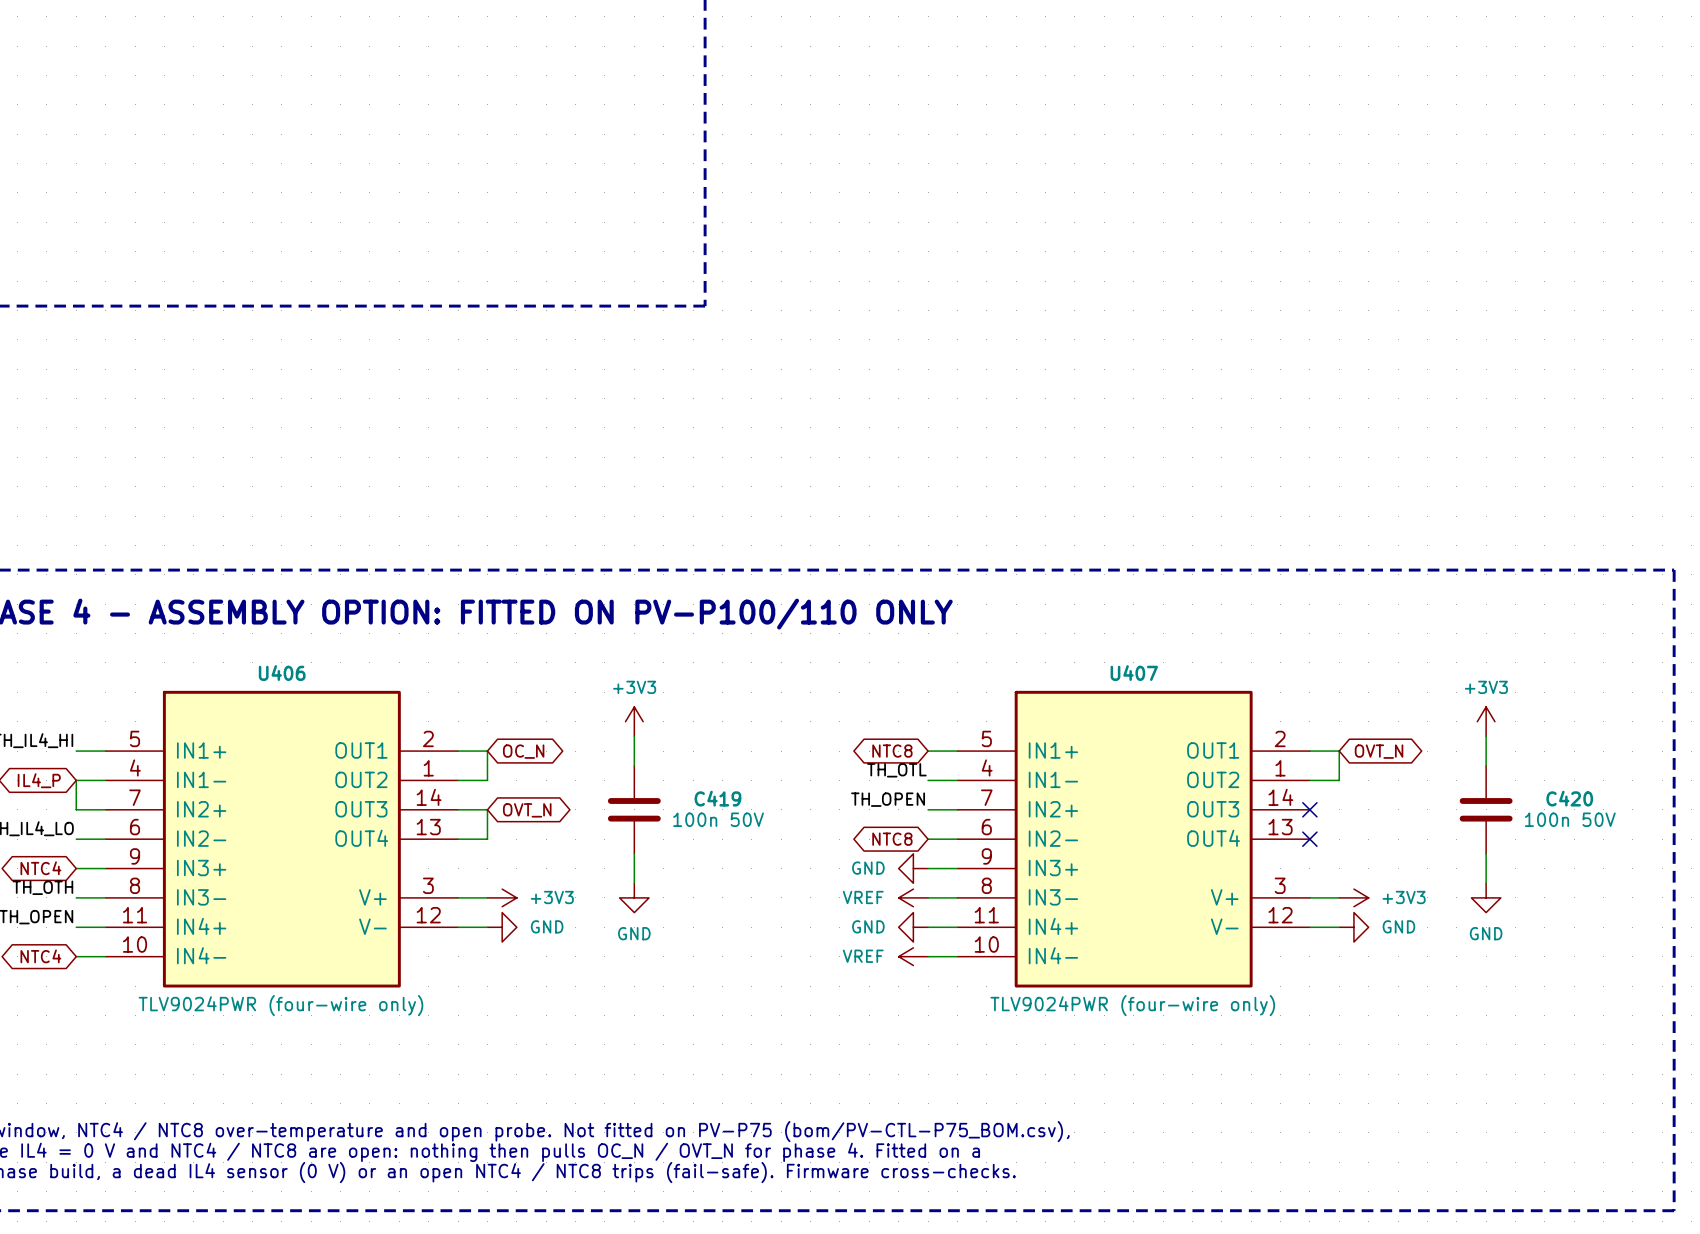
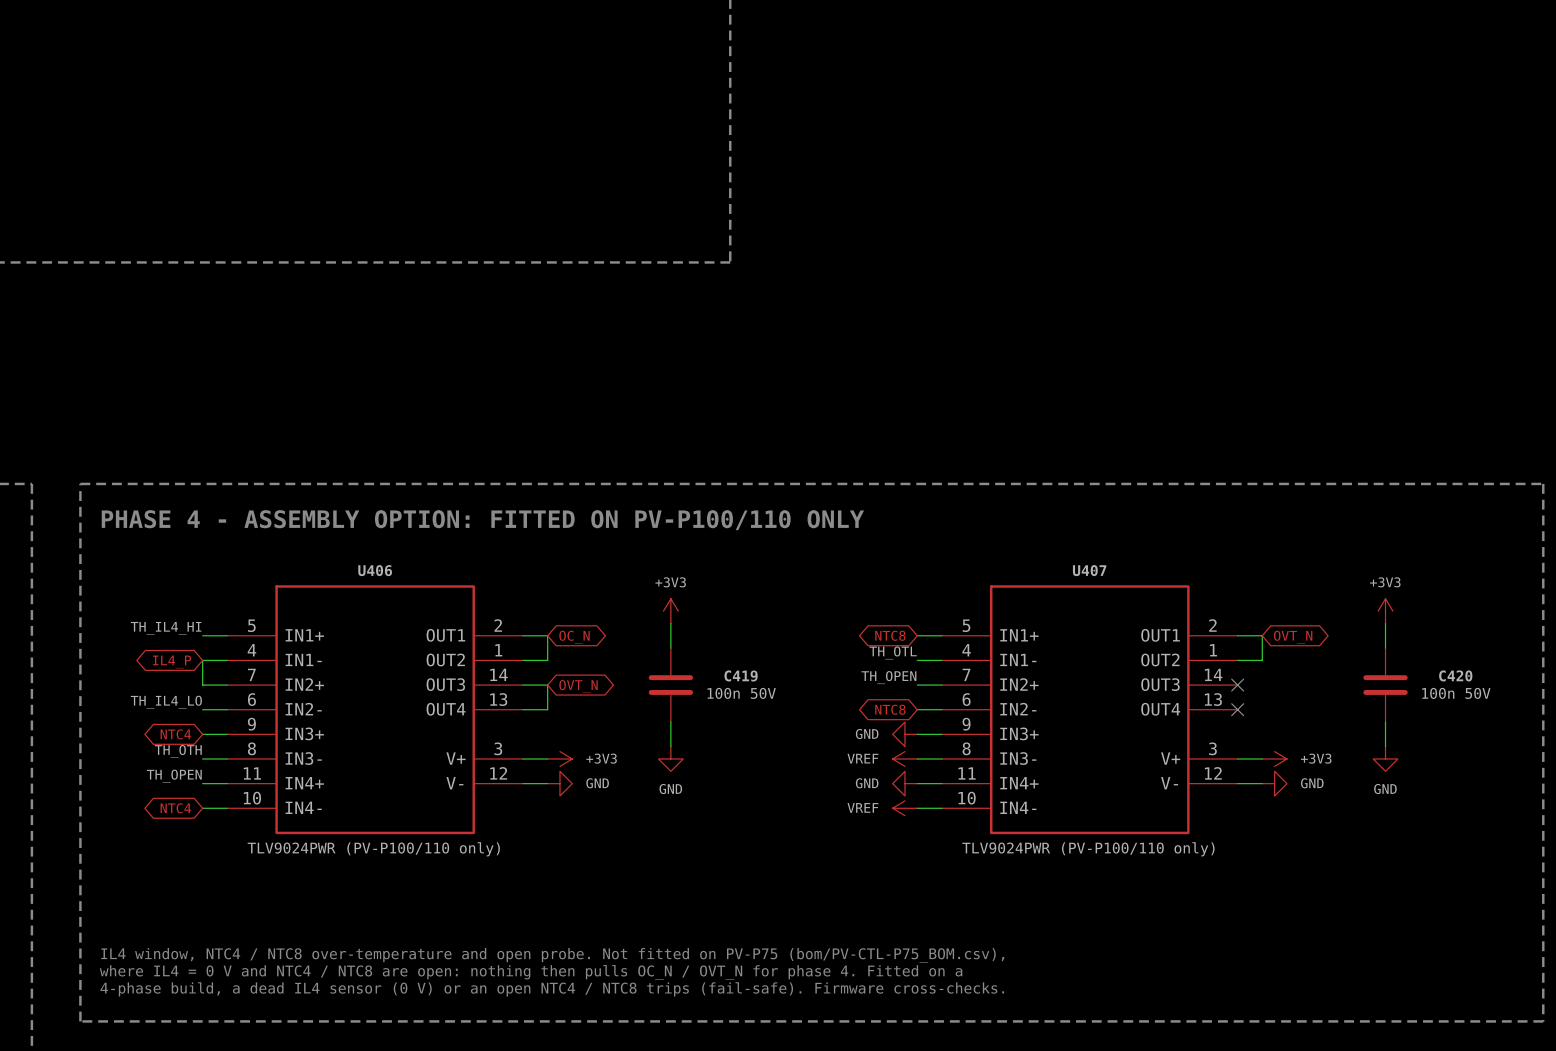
U406 value: TLV9024PWR (four-wire only) (280, 1005) -> TLV9024PWR (PV-P100/110 only) (373, 849)
U407 value: TLV9024PWR (four-wire only) (1132, 1005) -> TLV9024PWR (PV-P100/110 only) (1088, 849)

